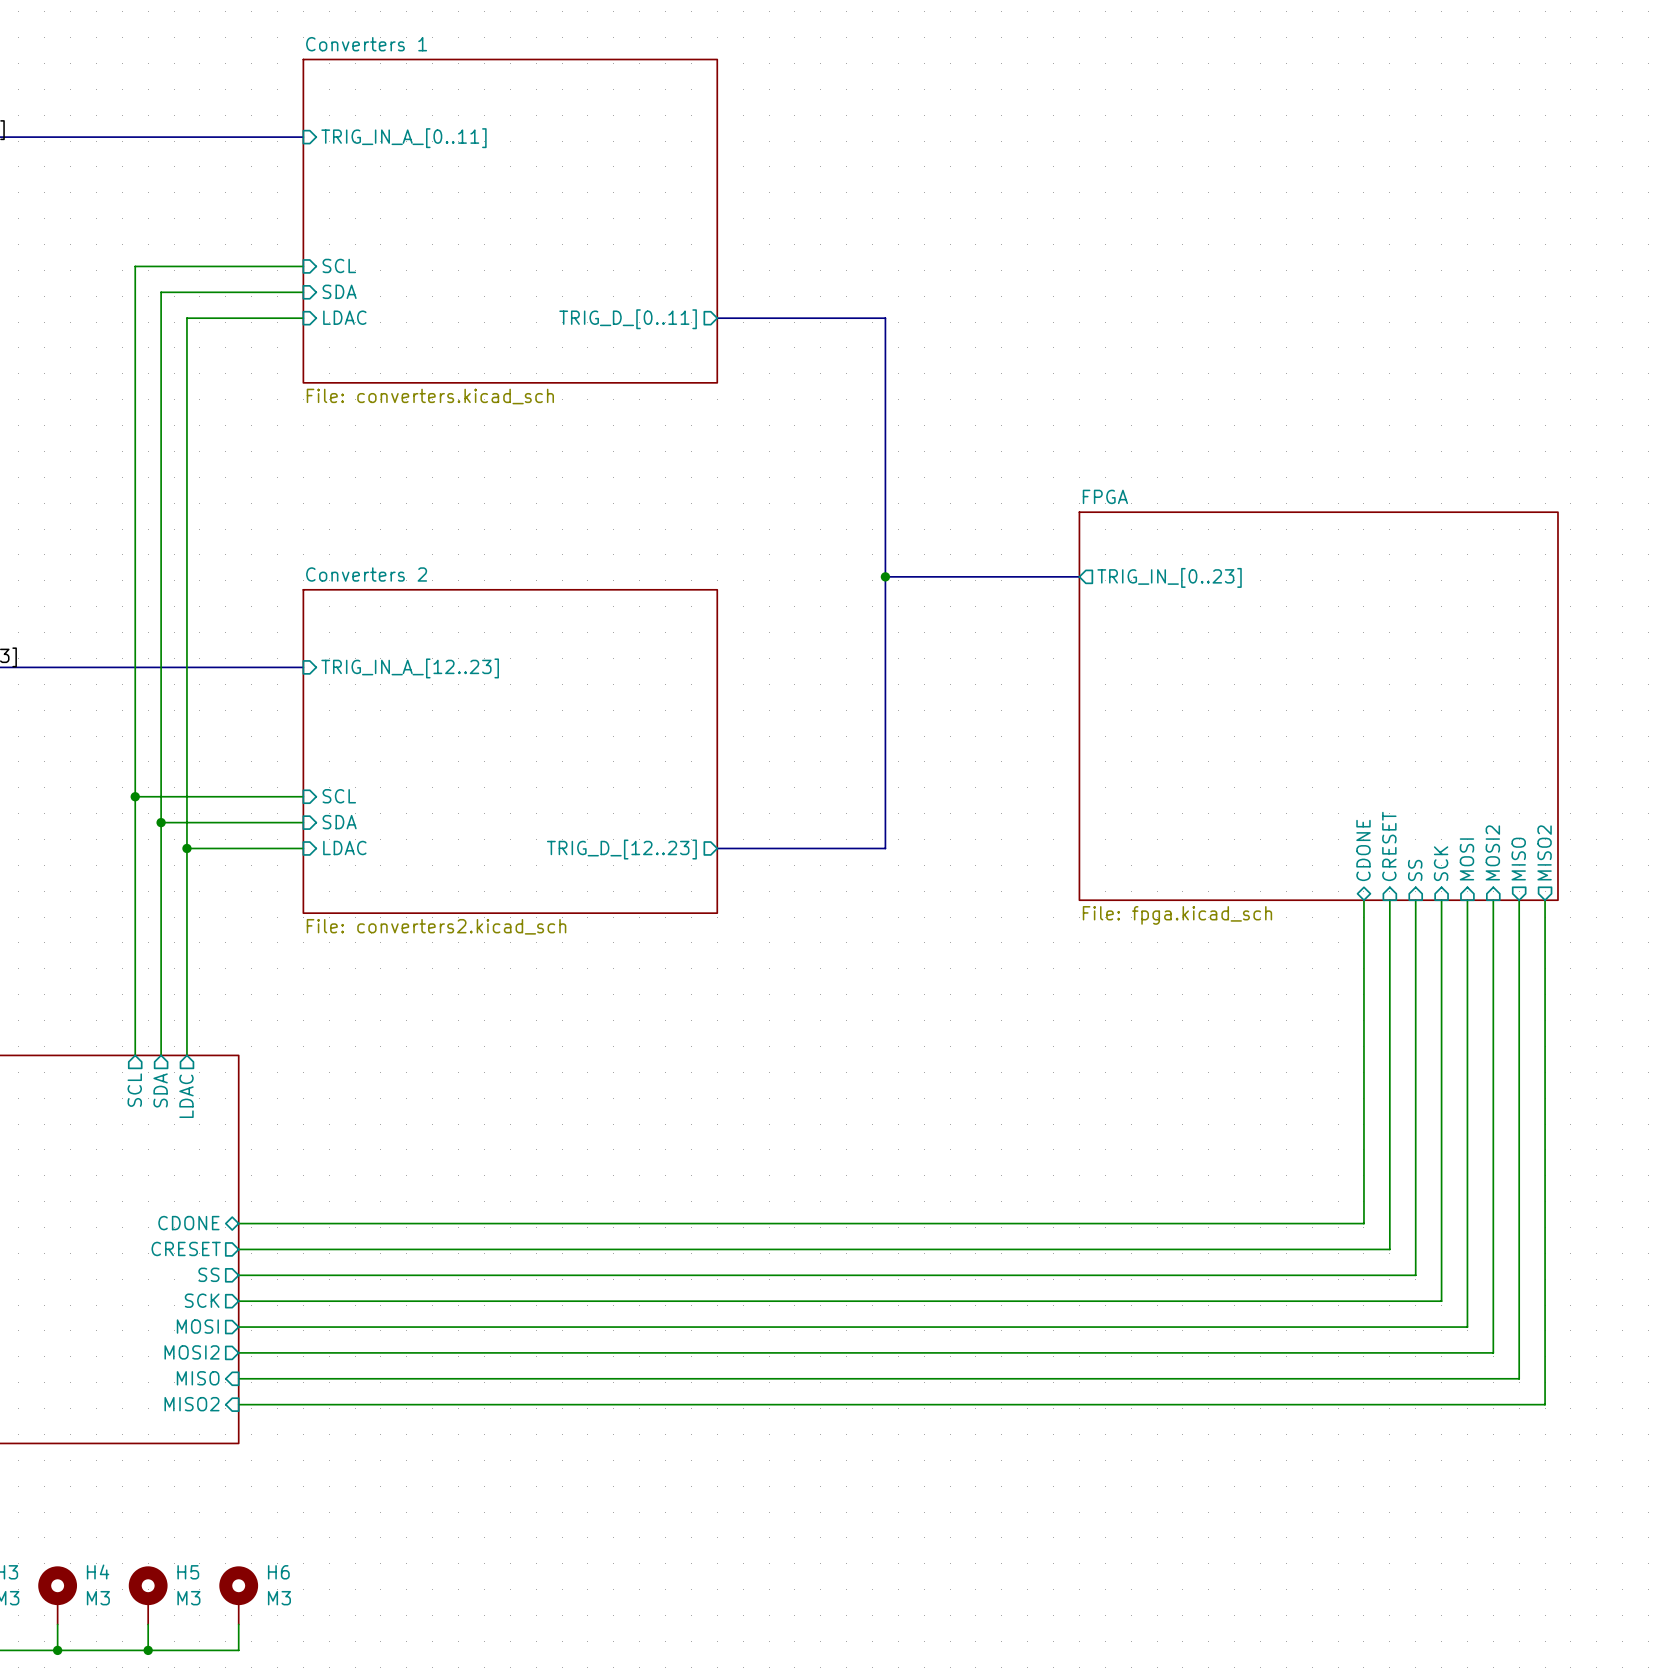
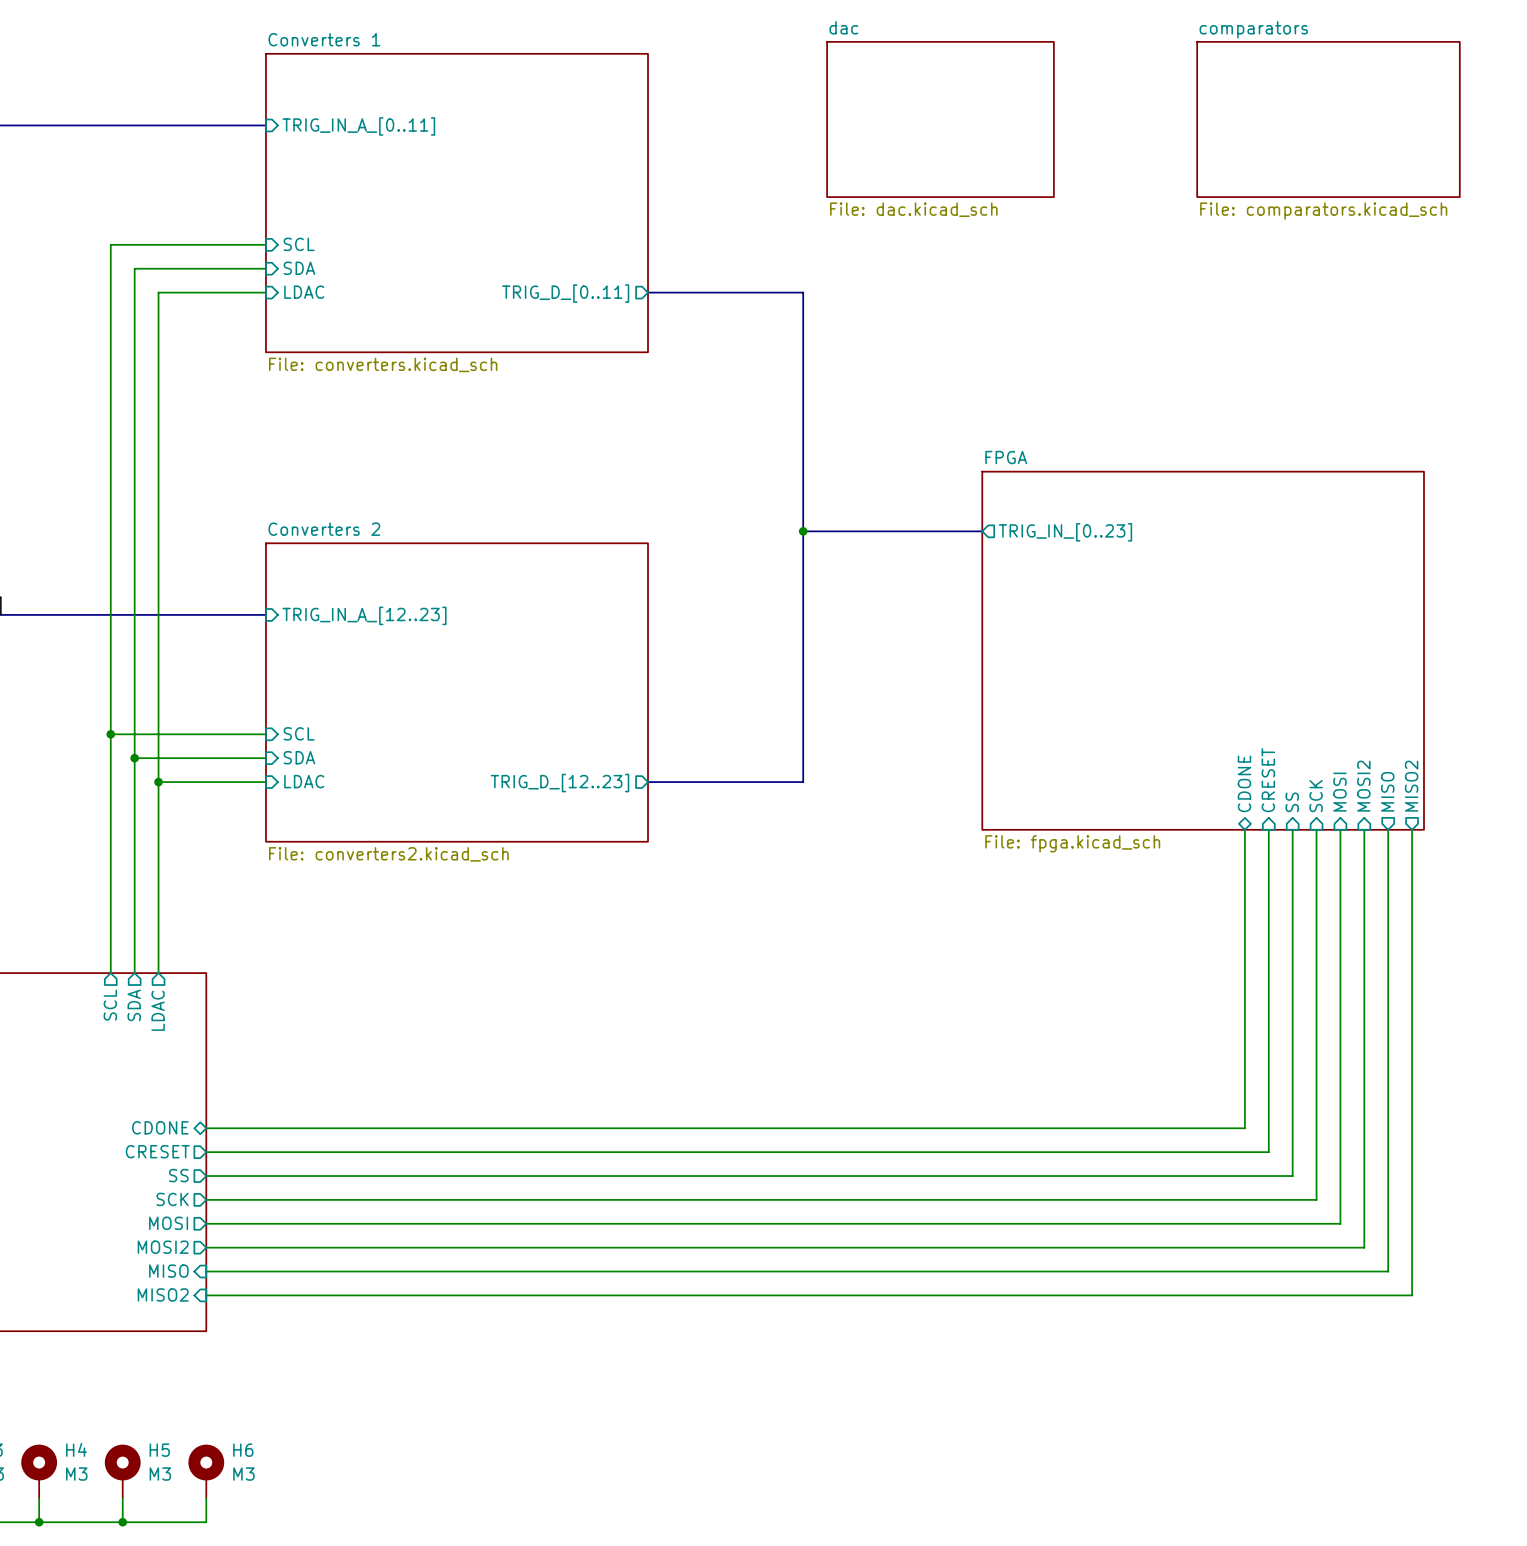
sheet dac: none -> File: dac.kicad_sch (940, 119)
sheet comparators: none -> File: comparators.kicad_sch (1328, 119)

